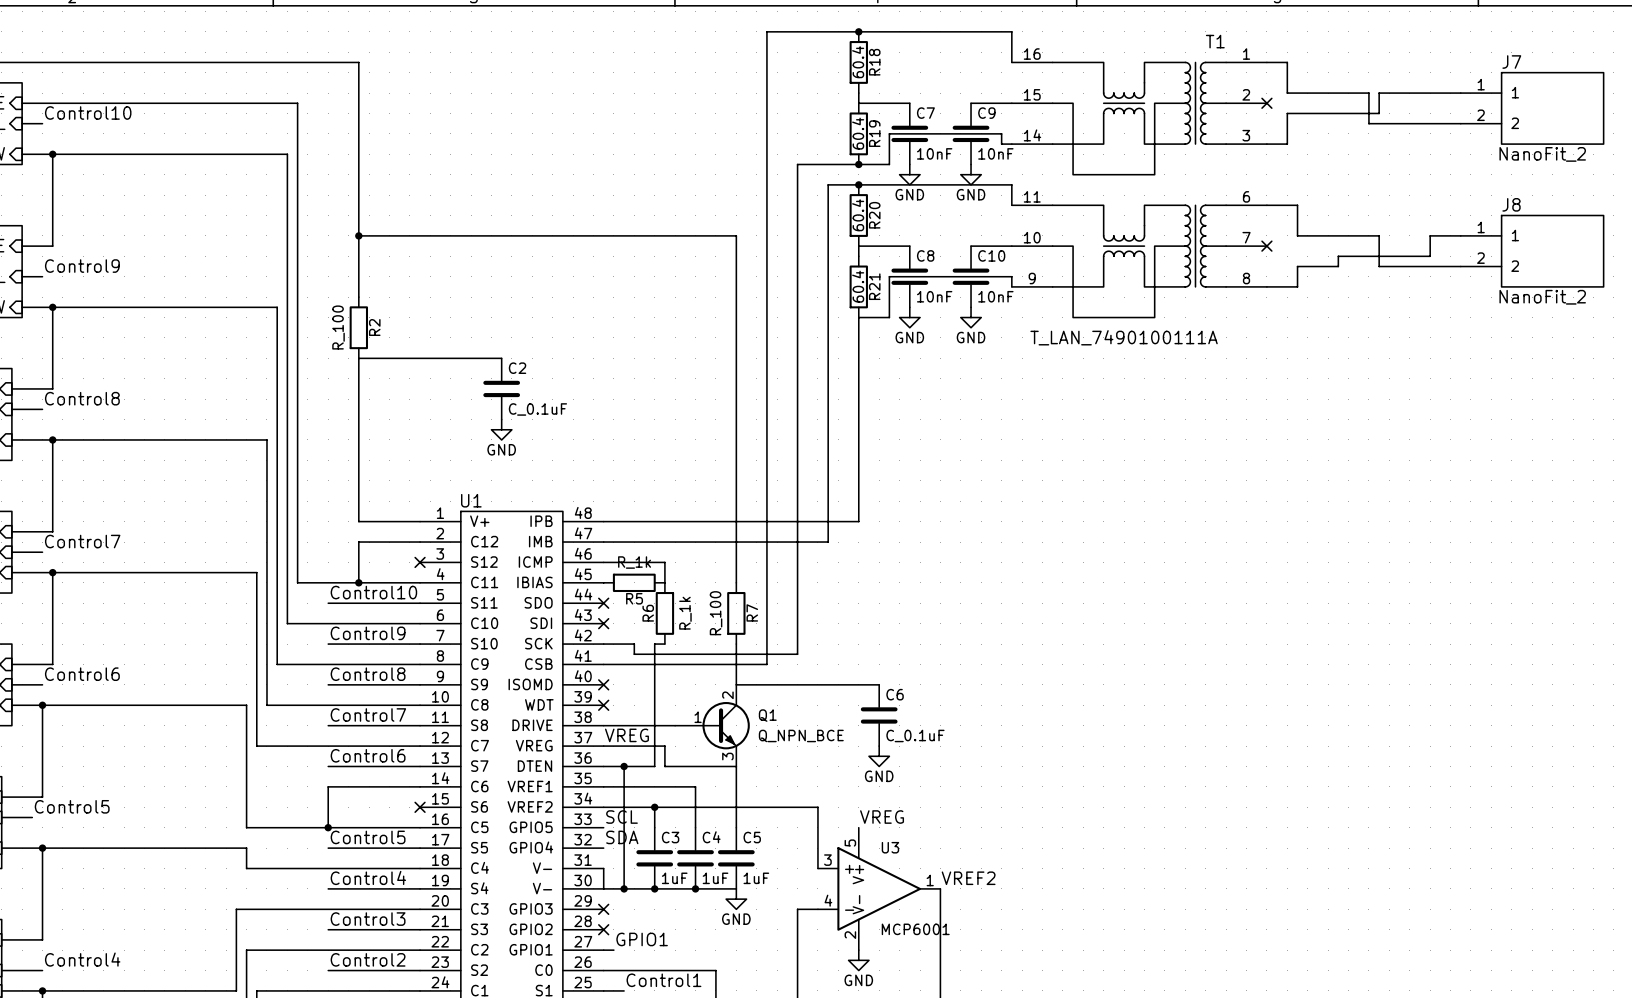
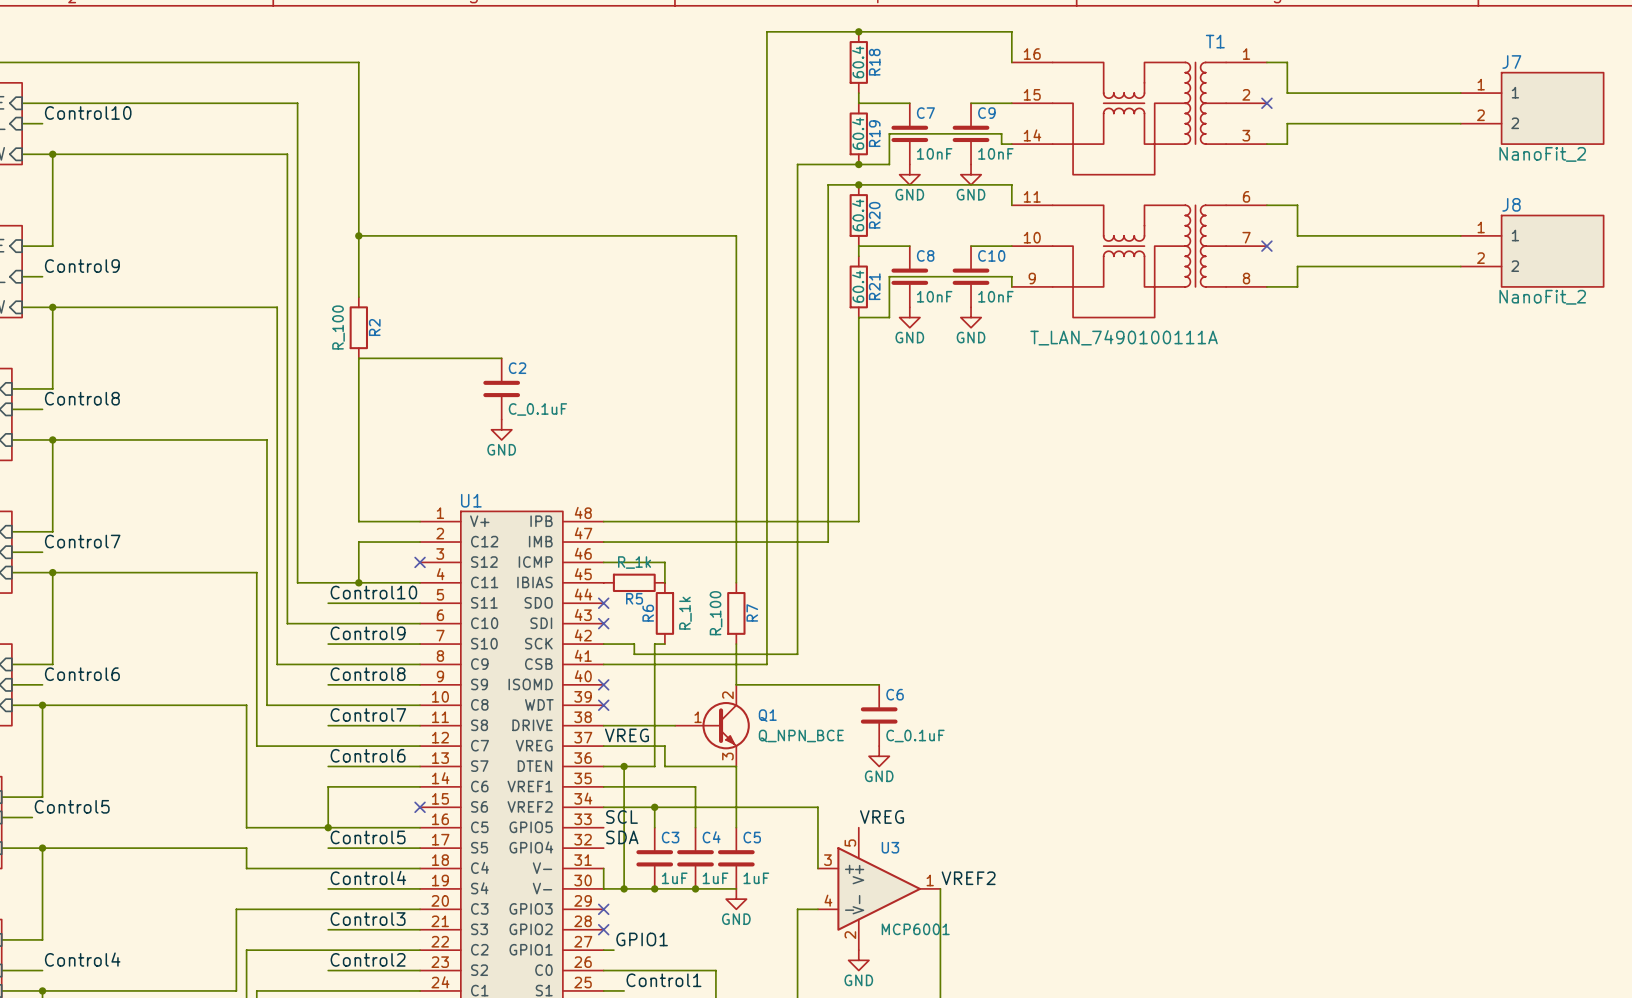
wire: (1368, 93) (1368, 123) -> (1368, 93) (1379, 93)
wire: (1379, 93) (1379, 113) (1287, 113) (1287, 123) -> (1368, 123) (1287, 123)
wire: (1379, 235) (1379, 266) -> (1338, 266) (1379, 266)
wire: (1430, 235) (1430, 256) (1338, 256) (1338, 266) -> (1430, 235) (1379, 235)

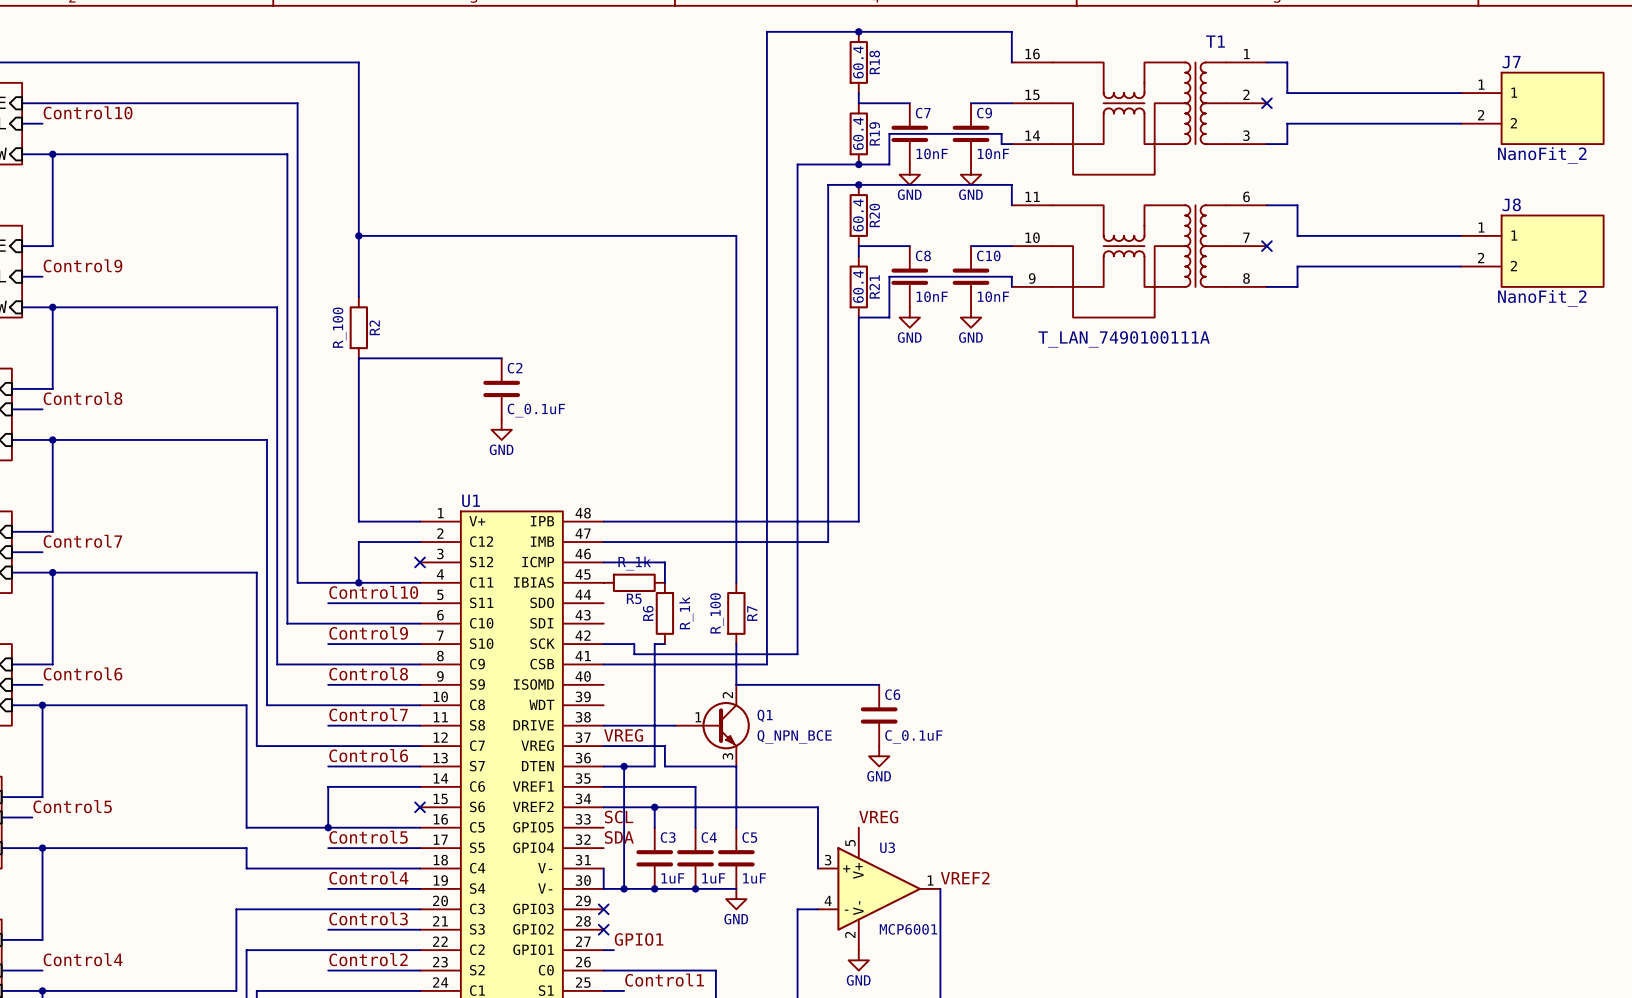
no-connect mark: (603, 603) -> none
no-connect mark: (603, 623) -> none
no-connect mark: (603, 684) -> none
no-connect mark: (603, 705) -> none

